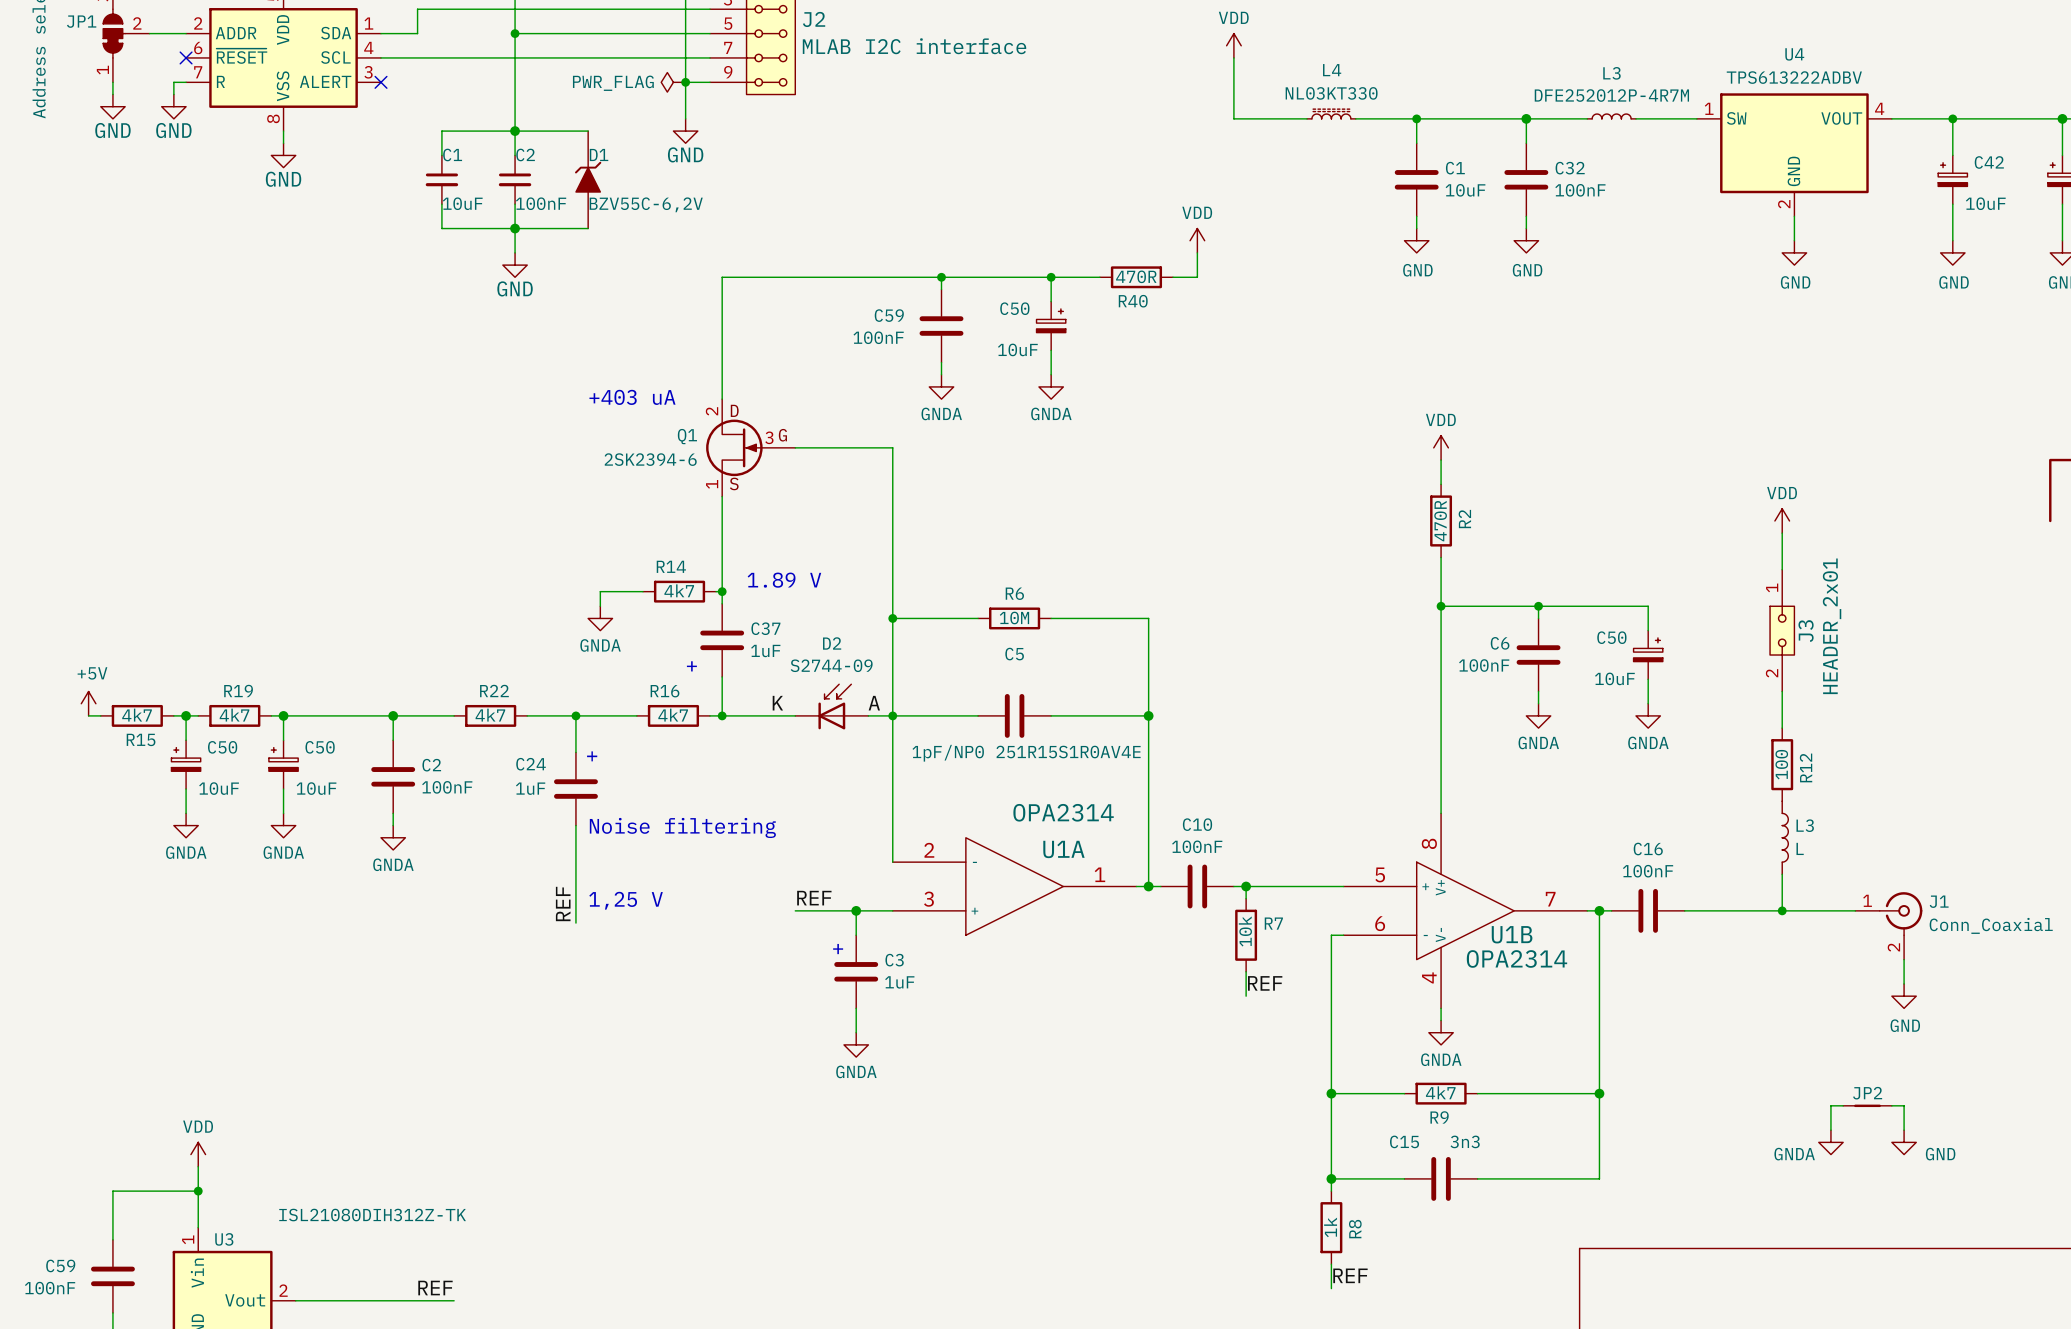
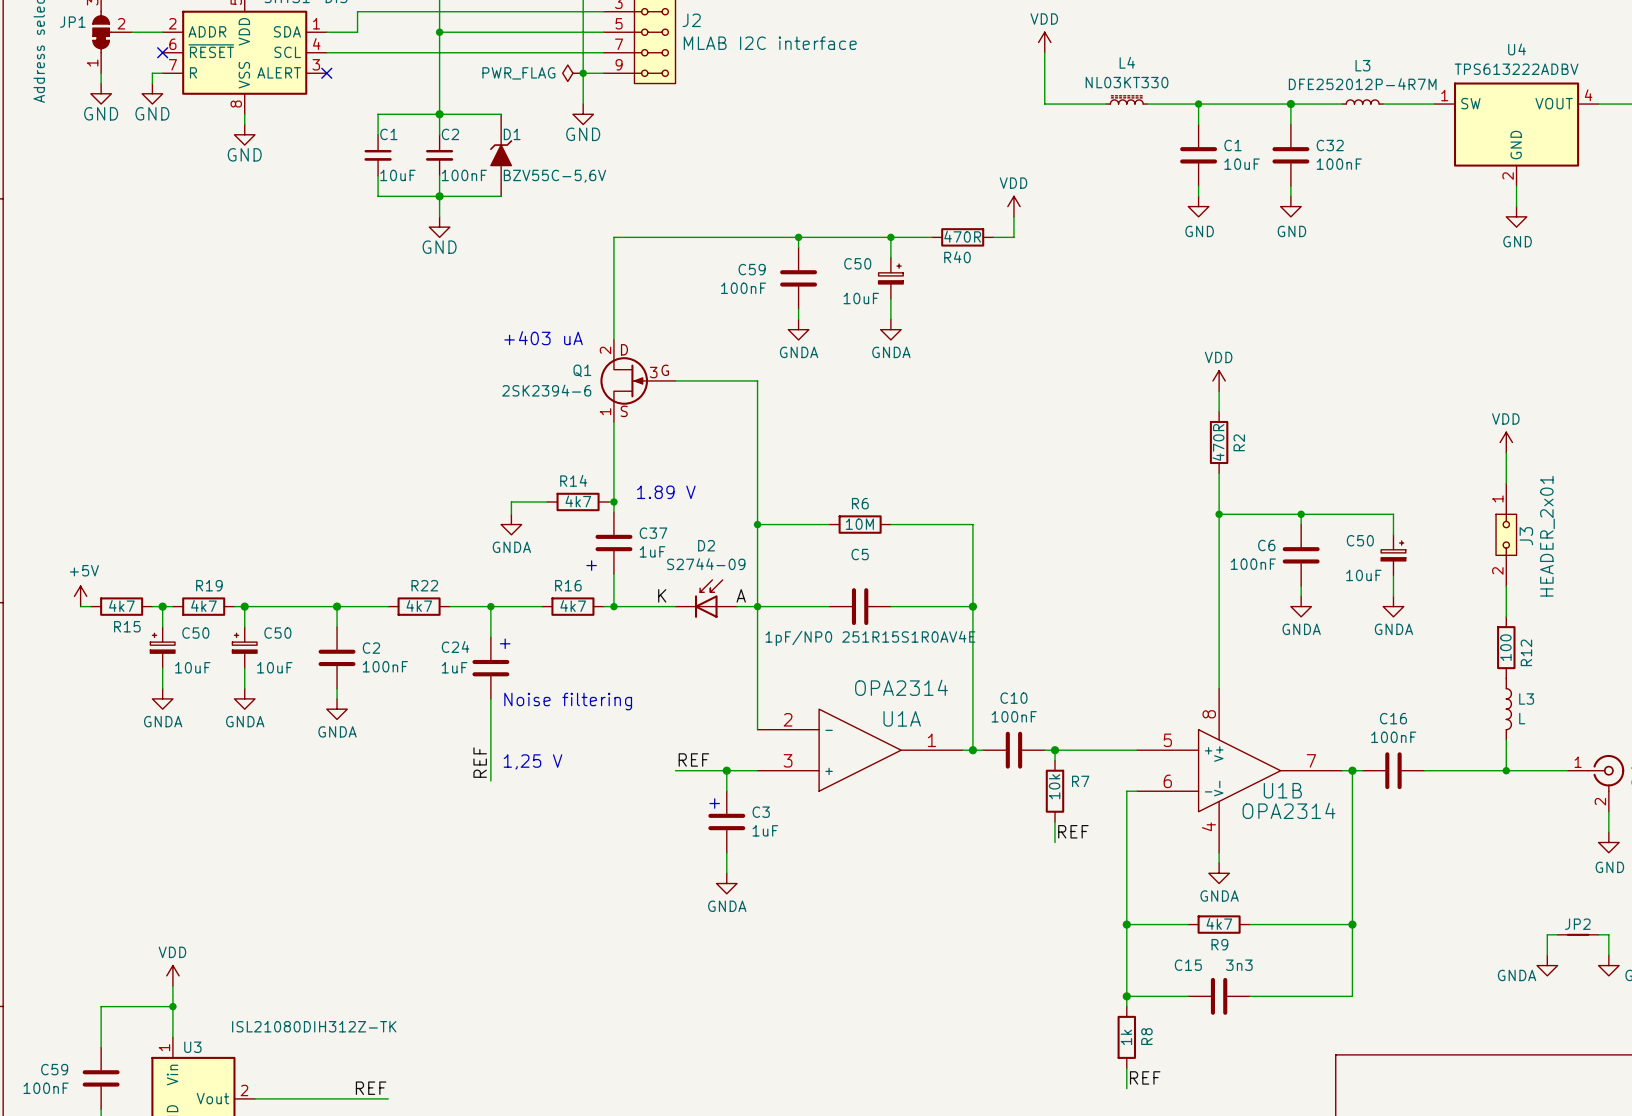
D1 value: BZV55C-6,2V (646, 204) -> BZV55C-5,6V (554, 176)

